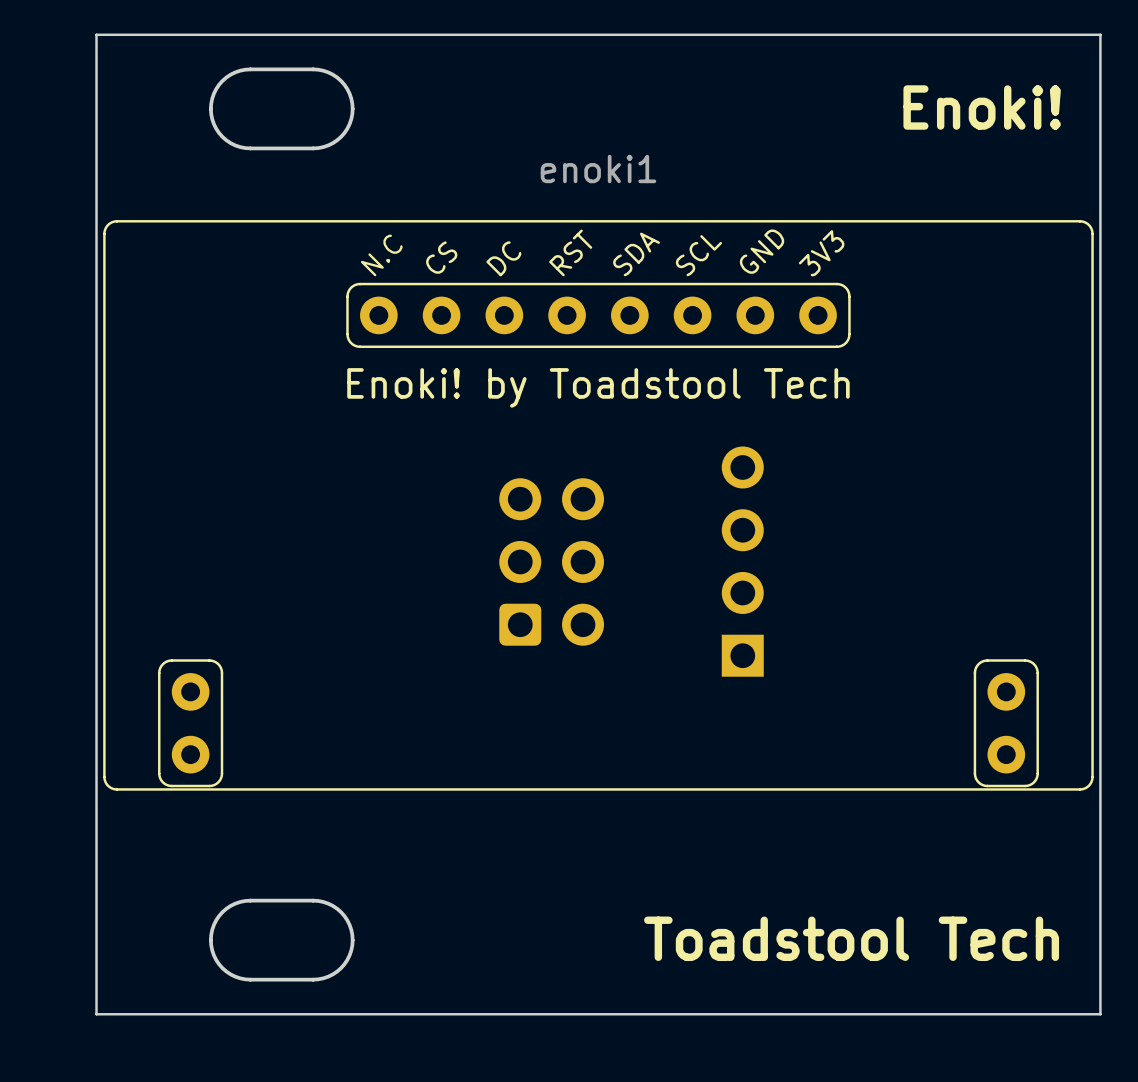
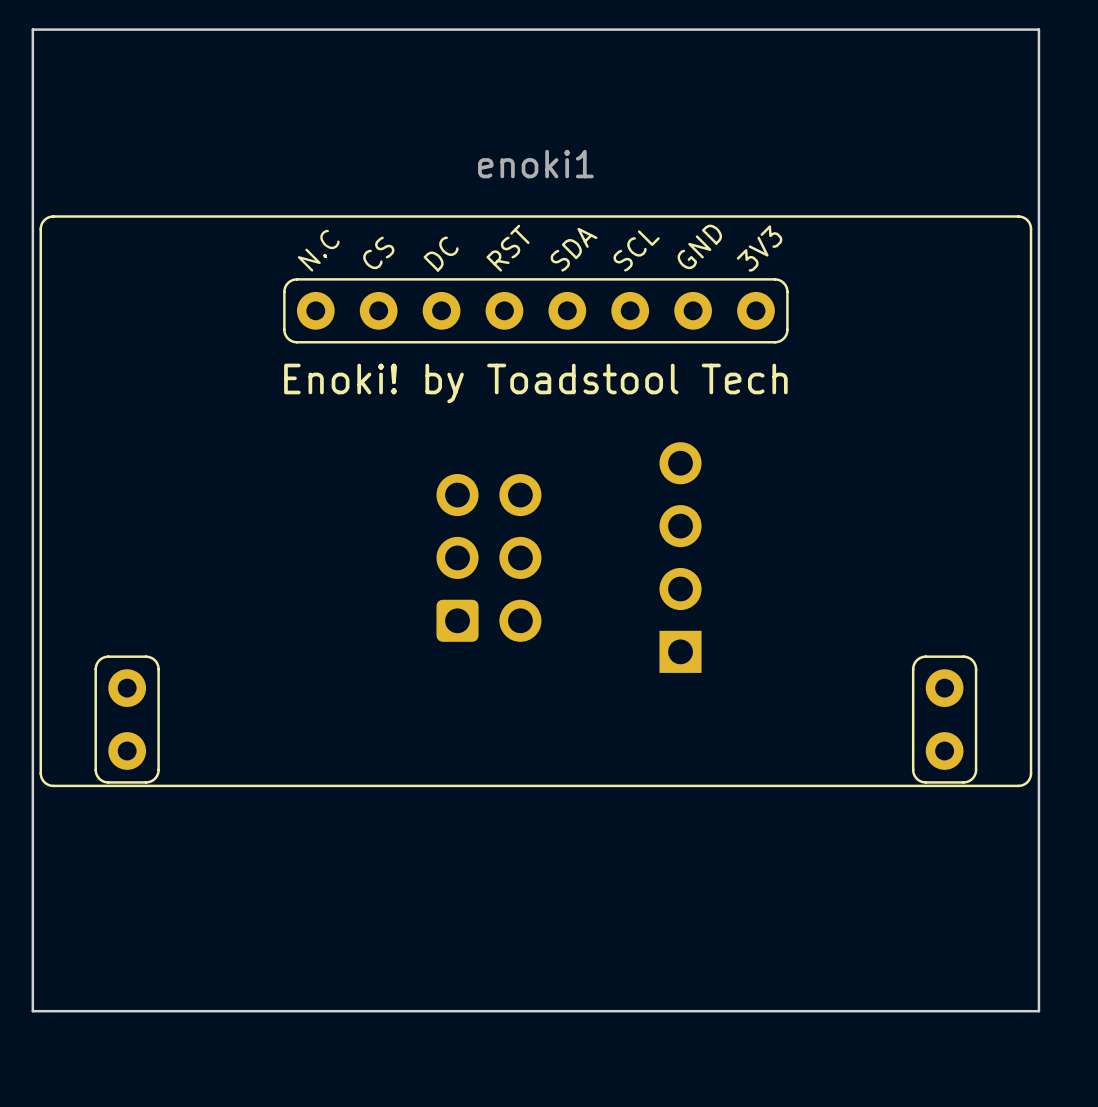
board edge: (250, 69) (313, 69) (332, 74) (344, 84) (351, 98) (352, 114) (347, 128) (332, 143) (318, 148) (250, 148) (230, 143) (219, 132) (213, 124) (211, 114) (212, 98) (216, 89) (226, 77) (235, 72) (250, 69) -> none
text: Enoki! (982, 107) -> none
board edge: (250, 900) (313, 900) (332, 905) (344, 916) (351, 929) (352, 945) (347, 959) (332, 974) (318, 979) (250, 979) (230, 974) (222, 968) (213, 955) (211, 945) (212, 929) (216, 920) (226, 908) (235, 903) (250, 900) -> none
text: Toadstool Tech (851, 938) -> none

